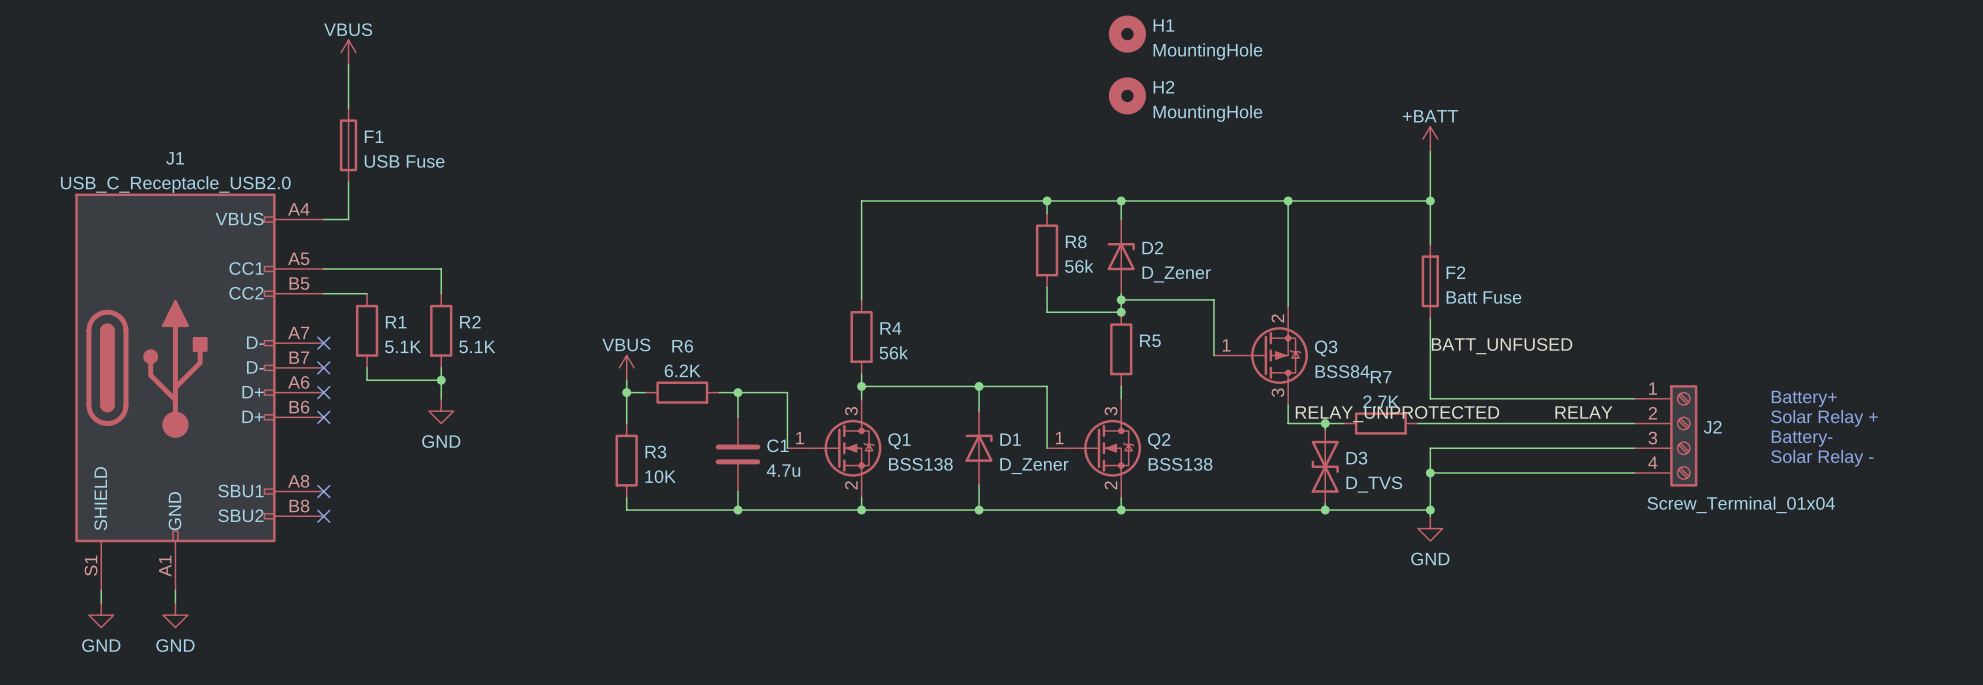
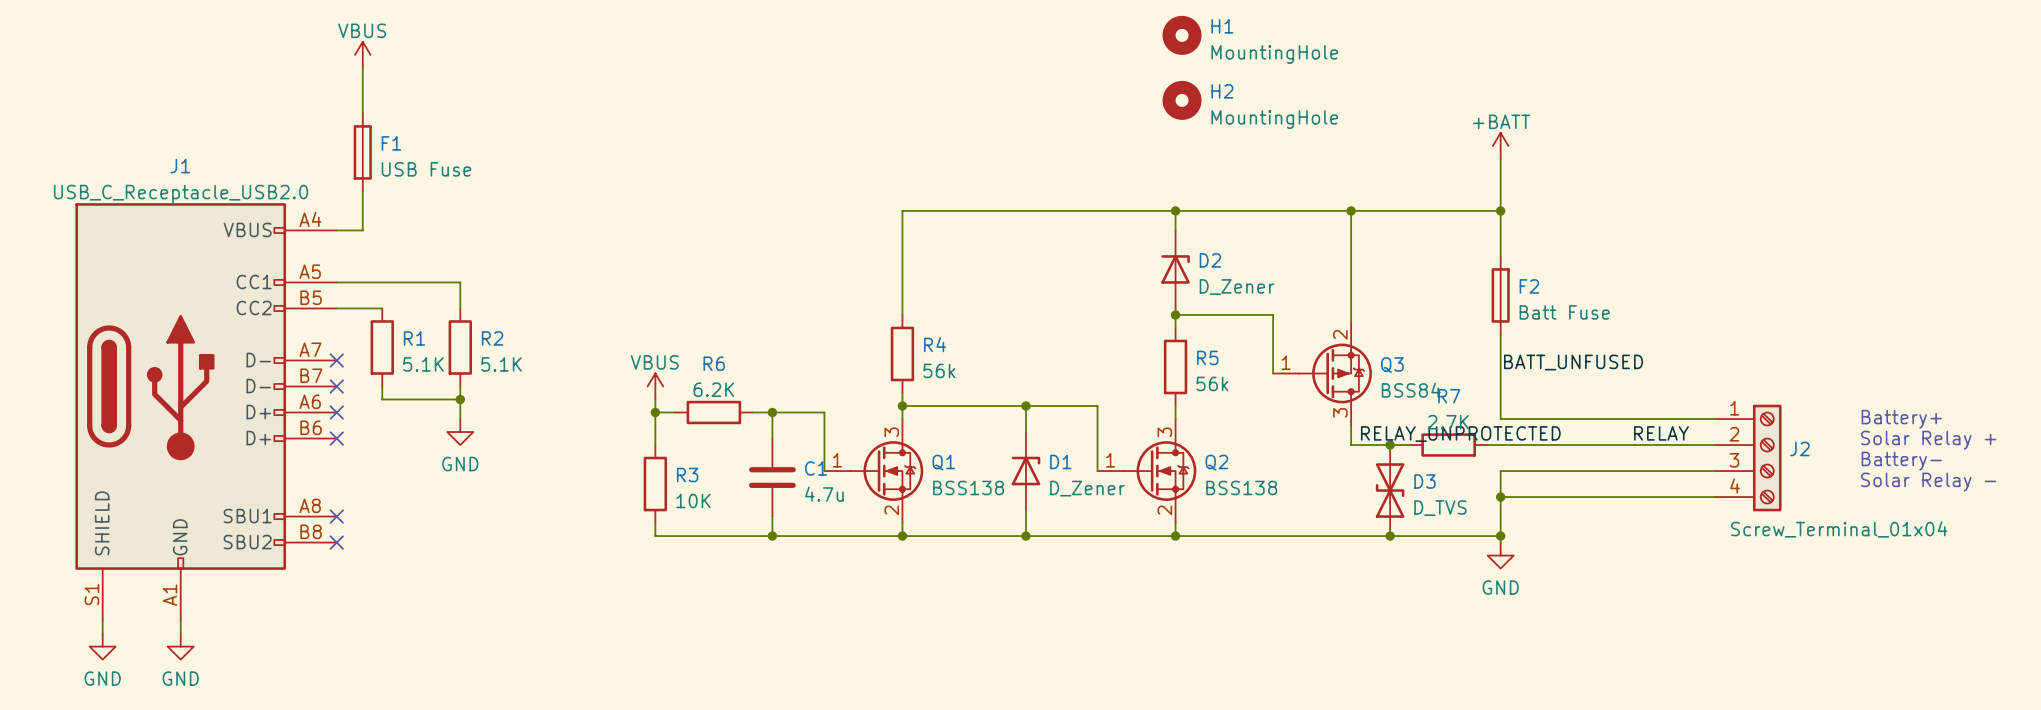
wire: (1047, 200) (1047, 213) -> none
junction: (1047, 200) -> none
R8: 56k (1047, 250) -> none
wire: (1047, 287) (1047, 312) (1121, 312) -> none
junction: (1121, 312) -> none
R5 value: none -> 56k (1212, 383)

